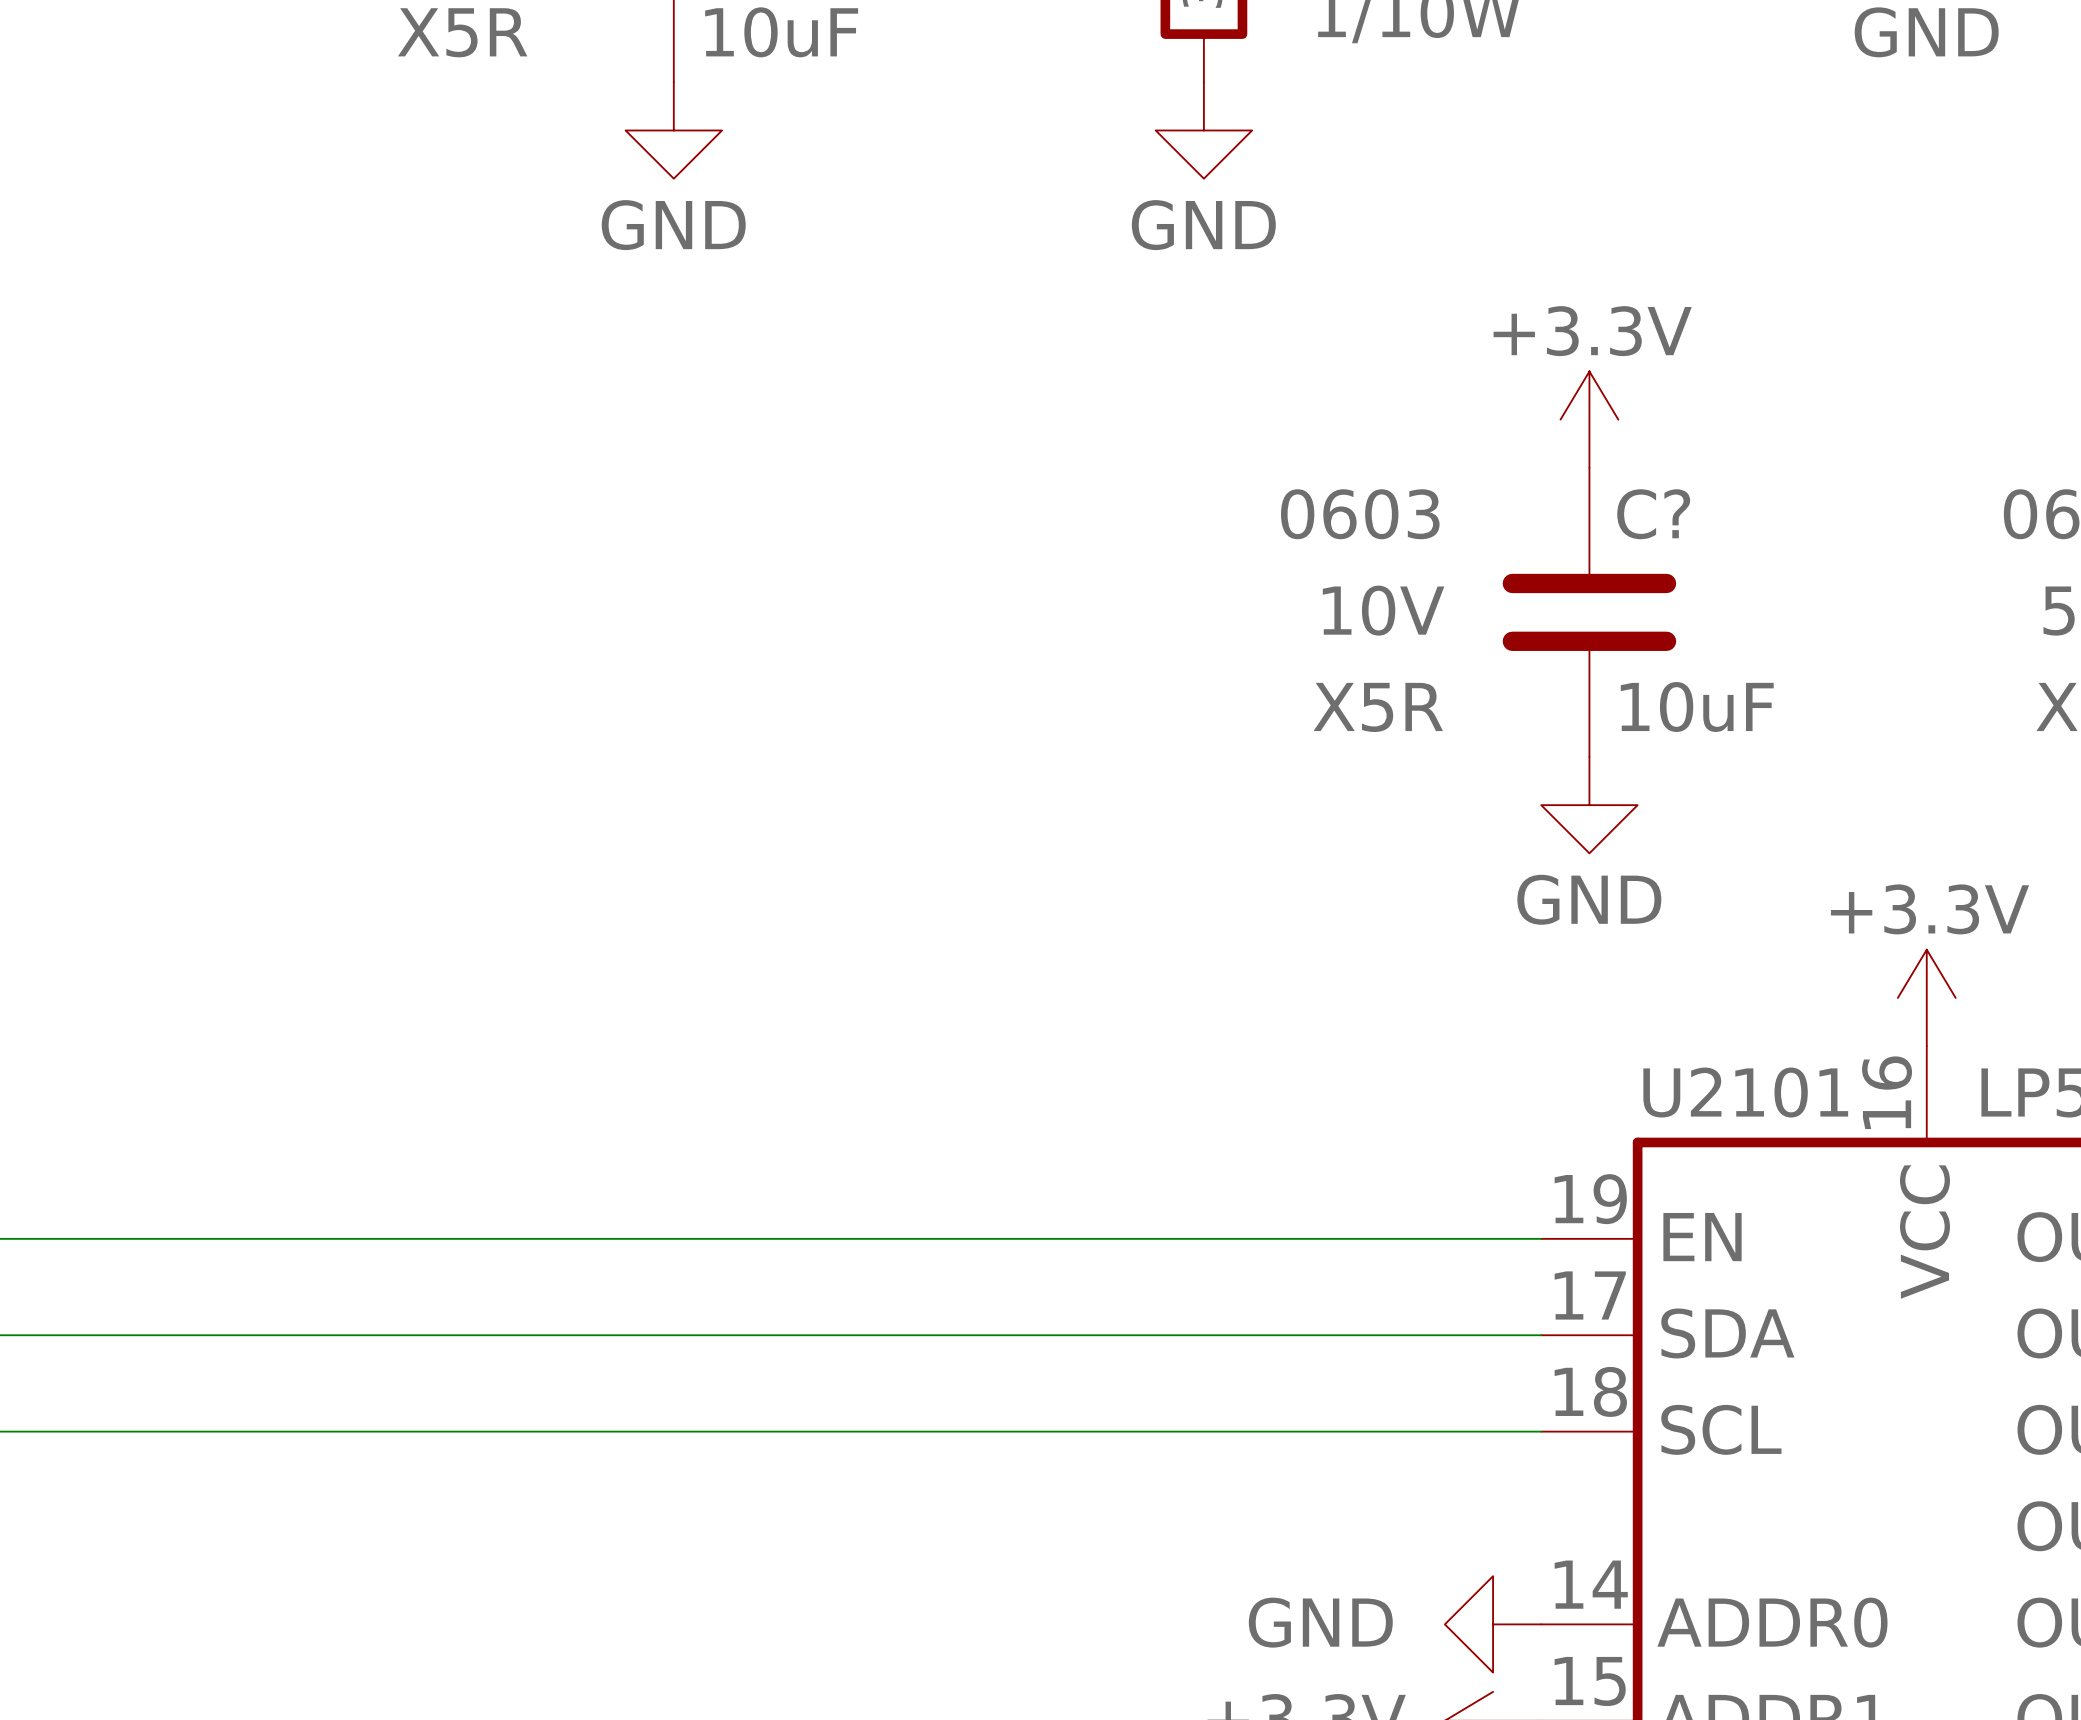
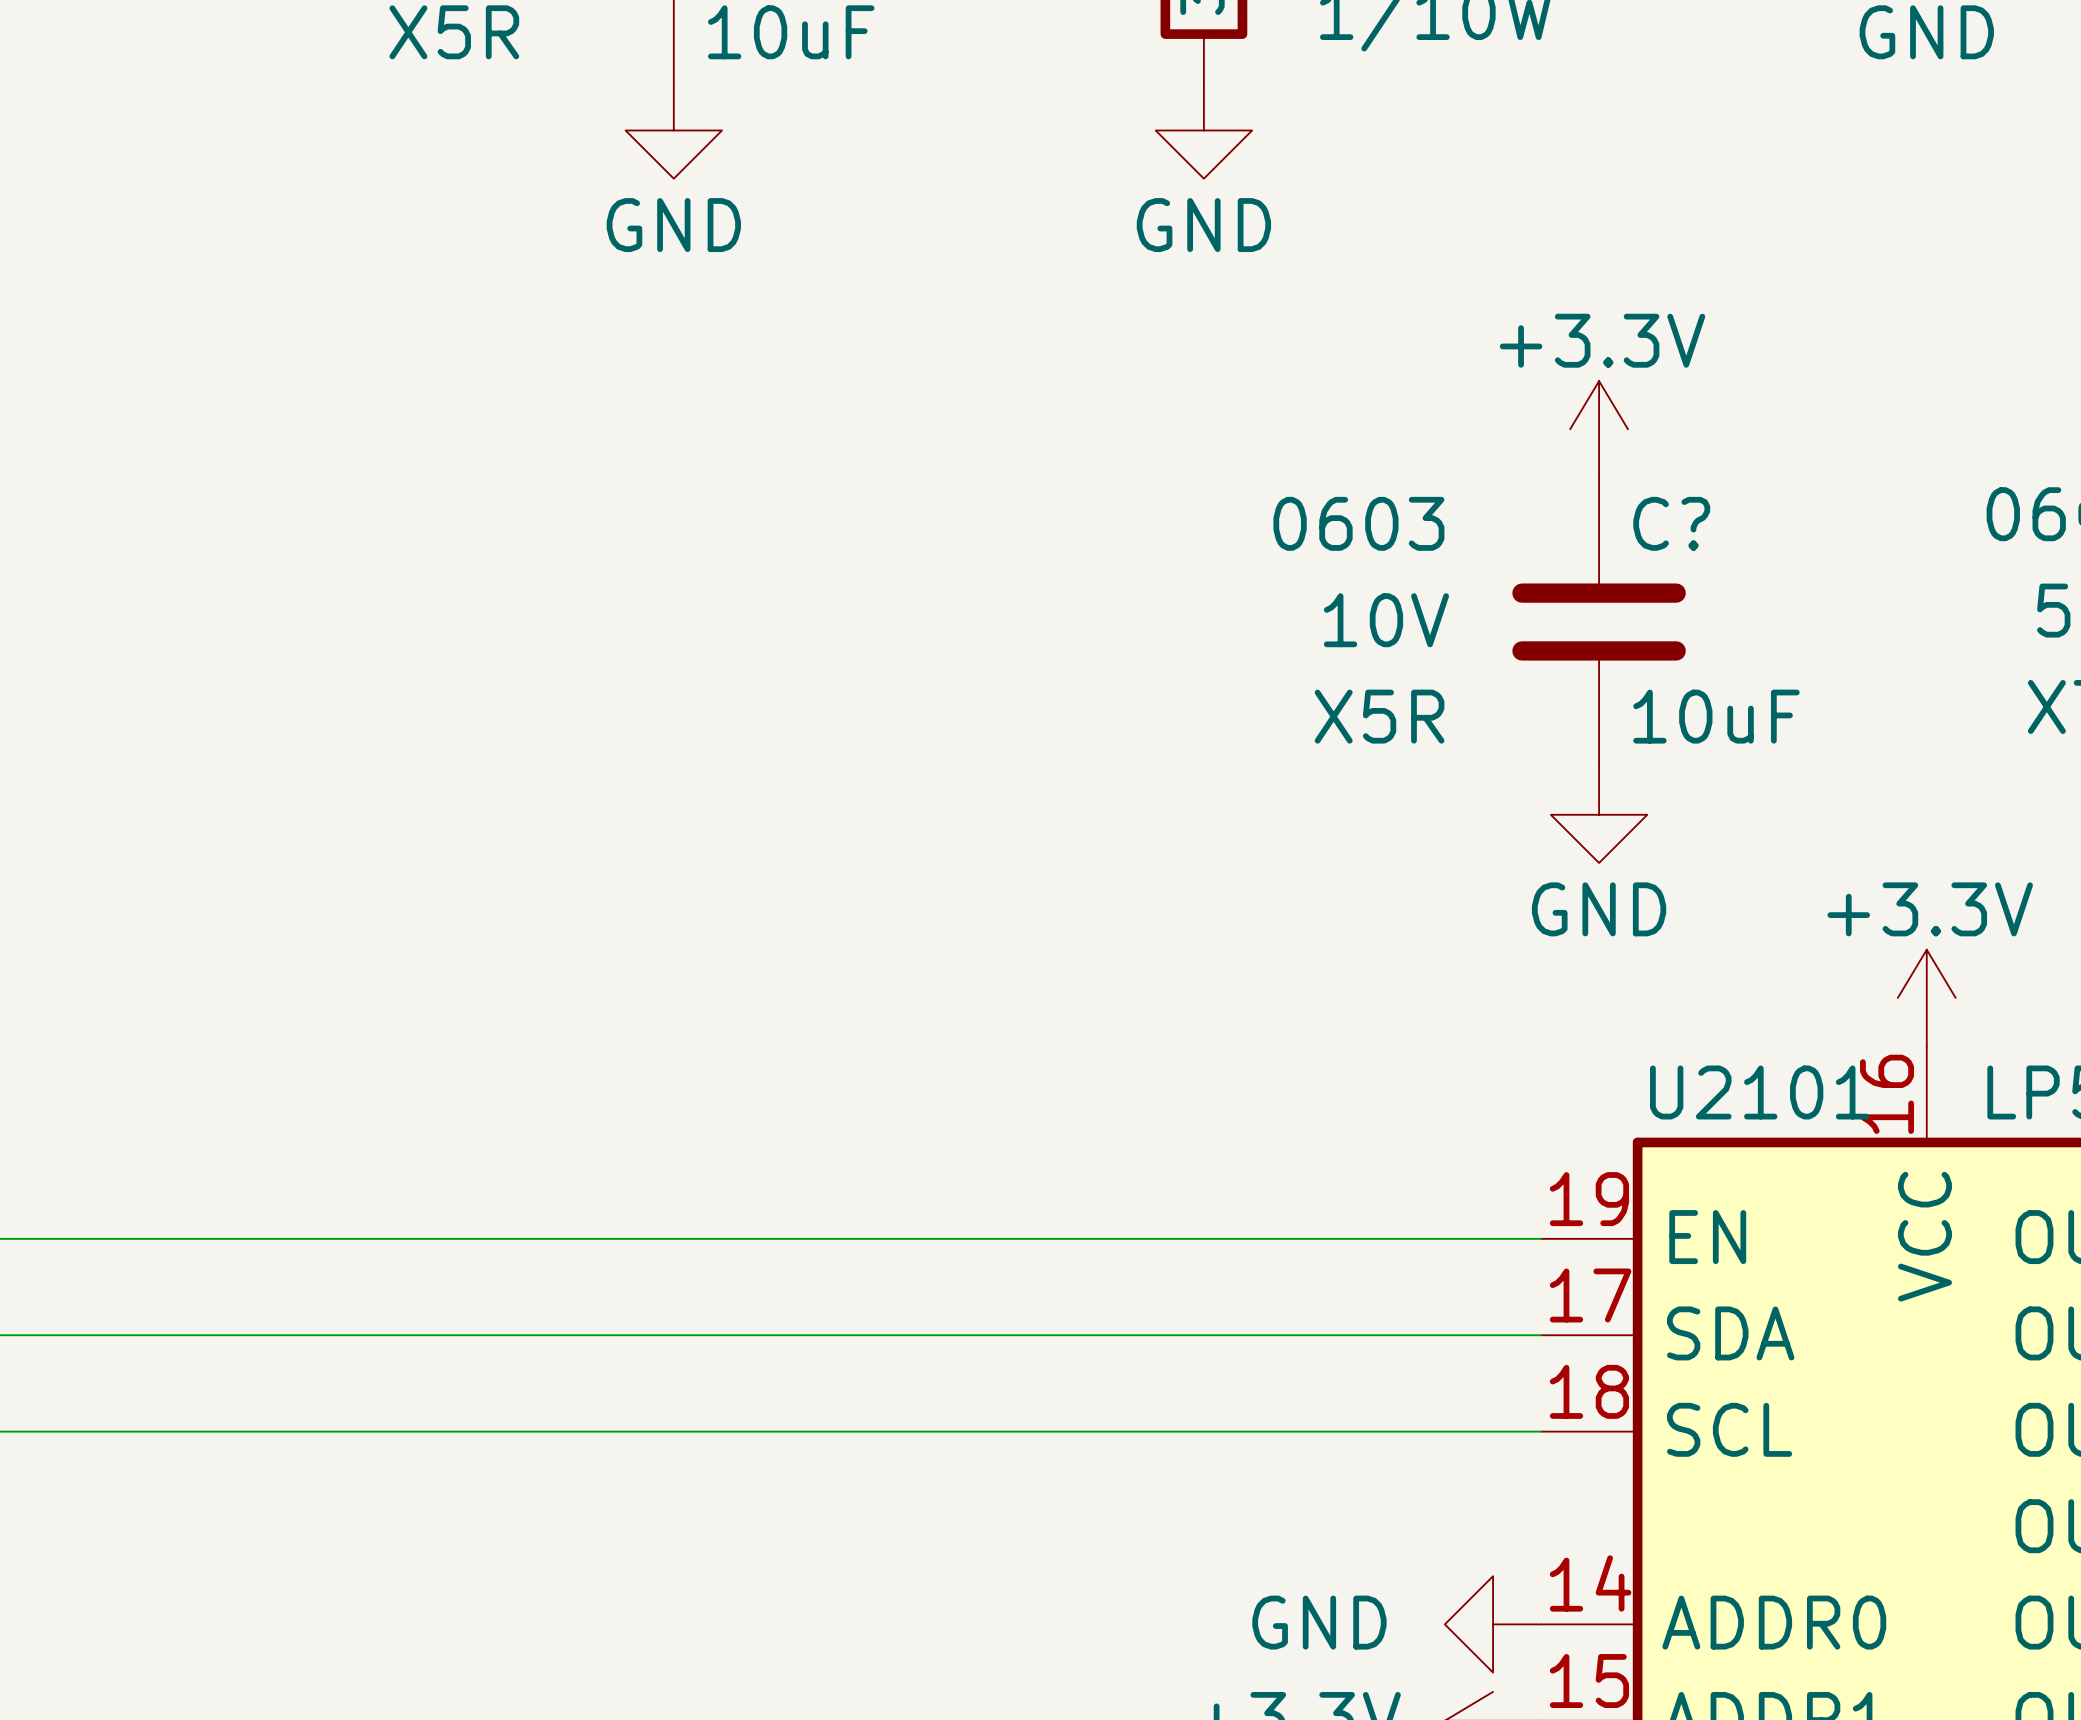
power symbol position: +3.3V (1589, 419) -> +3.3V (1599, 429)
C? position: (1589, 612) -> (1599, 622)
power symbol position: GND (1589, 805) -> GND (1599, 814)

